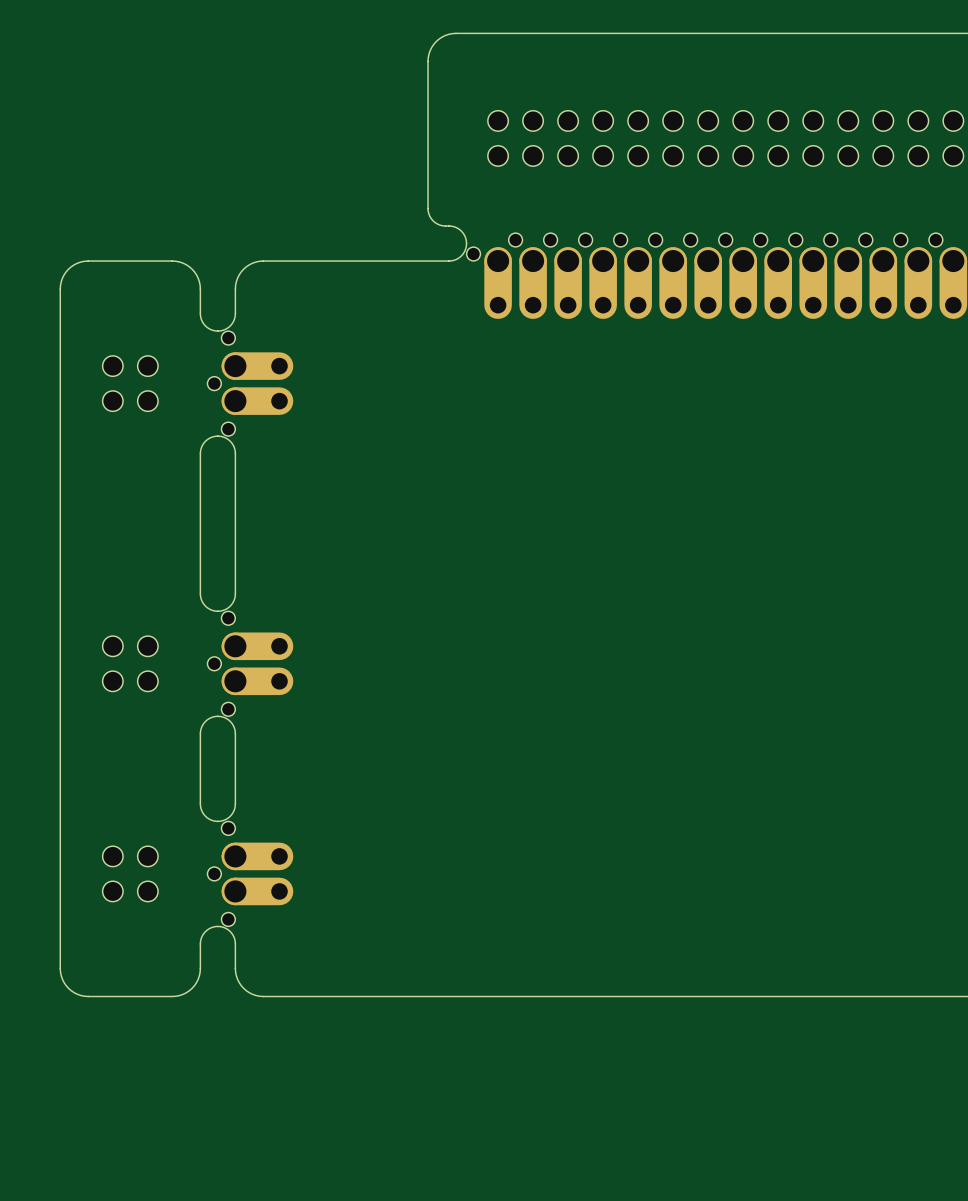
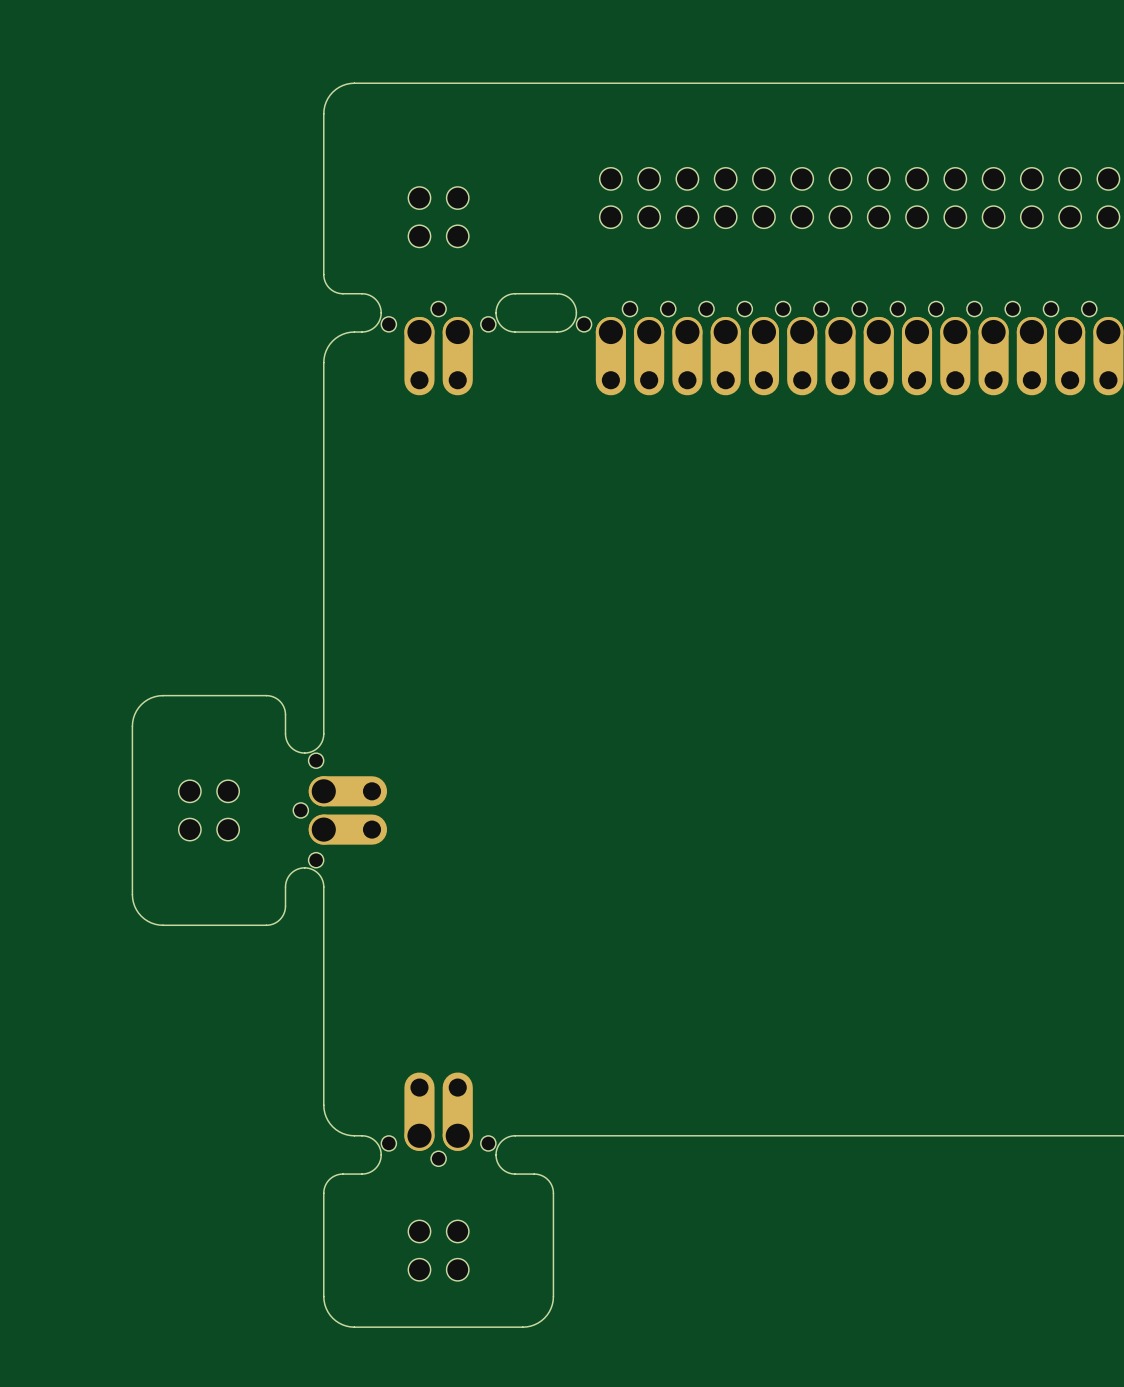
board edge: (456, 33) (445, 35) (436, 41) (430, 50) (428, 61) (428, 210) (433, 220) (445, 226) -> (564, 83) (354, 83) (342, 85) (330, 95) (326, 102) (323, 113) (323, 276) (327, 286) (334, 291) (366, 294) (378, 302) (381, 312) (378, 323) (370, 330) (362, 332)
part: none -> (438, 217)
part: none -> (438, 316)
board edge: (410, 261) (270, 261) -> (515, 332) (504, 329) (497, 321) (496, 308) (501, 299) (513, 293) (553, 293)
part: none -> (419, 356)
part: none -> (457, 356)
board edge: (235, 313) (232, 322) (225, 329) (213, 330) (205, 325) (200, 315) (198, 278) (192, 269) (179, 261) (84, 261) (74, 264) (64, 275) (60, 289) (60, 621) -> (323, 389) (323, 542)
part: (257, 366) -> none
part: (130, 383) -> none
part: (221, 383) -> none
part: (257, 401) -> none
board edge: (235, 453) (230, 441) (217, 436) (205, 441) (200, 453) (200, 597) (206, 607) (219, 611) (230, 606) (235, 593) -> (132, 726) (134, 714) (138, 707) (147, 699) (155, 696) (268, 695) (278, 699) (284, 708) (285, 736) (288, 744) (296, 751) (306, 752) (316, 748) (322, 740) (323, 695)
part: (257, 646) -> none
part position: (130, 663) -> (208, 810)
part position: (221, 663) -> (308, 810)
part: none -> (347, 829)
board edge: (235, 768) (234, 728) (228, 720) (217, 716) (206, 720) (201, 728) (200, 768) -> (323, 887) (318, 873) (304, 867) (291, 873) (285, 887)
board edge: (60, 775) (60, 968) (62, 979) (68, 988) (77, 994) (88, 996) (179, 995) (192, 988) (198, 979) (200, 942) (205, 931) (213, 926) (225, 928) (232, 934) (235, 943) -> (132, 894) (134, 906) (138, 913) (147, 921) (159, 925) (268, 925) (279, 919) (285, 906)
board edge: (200, 786) (201, 809) (210, 819) (219, 821) (227, 818) (232, 813) (235, 803) -> (323, 1078) (323, 925)
part: (257, 856) -> none
part: (130, 873) -> none
part: (221, 873) -> none
part: (257, 891) -> none
part: none -> (419, 1111)
part: none -> (457, 1111)
board edge: (410, 996) (270, 996) -> (515, 1135) (504, 1138) (497, 1146) (496, 1157) (500, 1166) (510, 1173) (542, 1175) (549, 1181) (552, 1188) (553, 1296) (551, 1308) (547, 1315) (538, 1323) (522, 1327) (354, 1327) (346, 1326) (335, 1320) (327, 1311) (324, 1304) (323, 1193) (326, 1183) (334, 1175) (366, 1173) (378, 1165) (381, 1154) (378, 1144) (370, 1137) (362, 1135)
part: none -> (438, 1151)
part: none -> (438, 1250)

